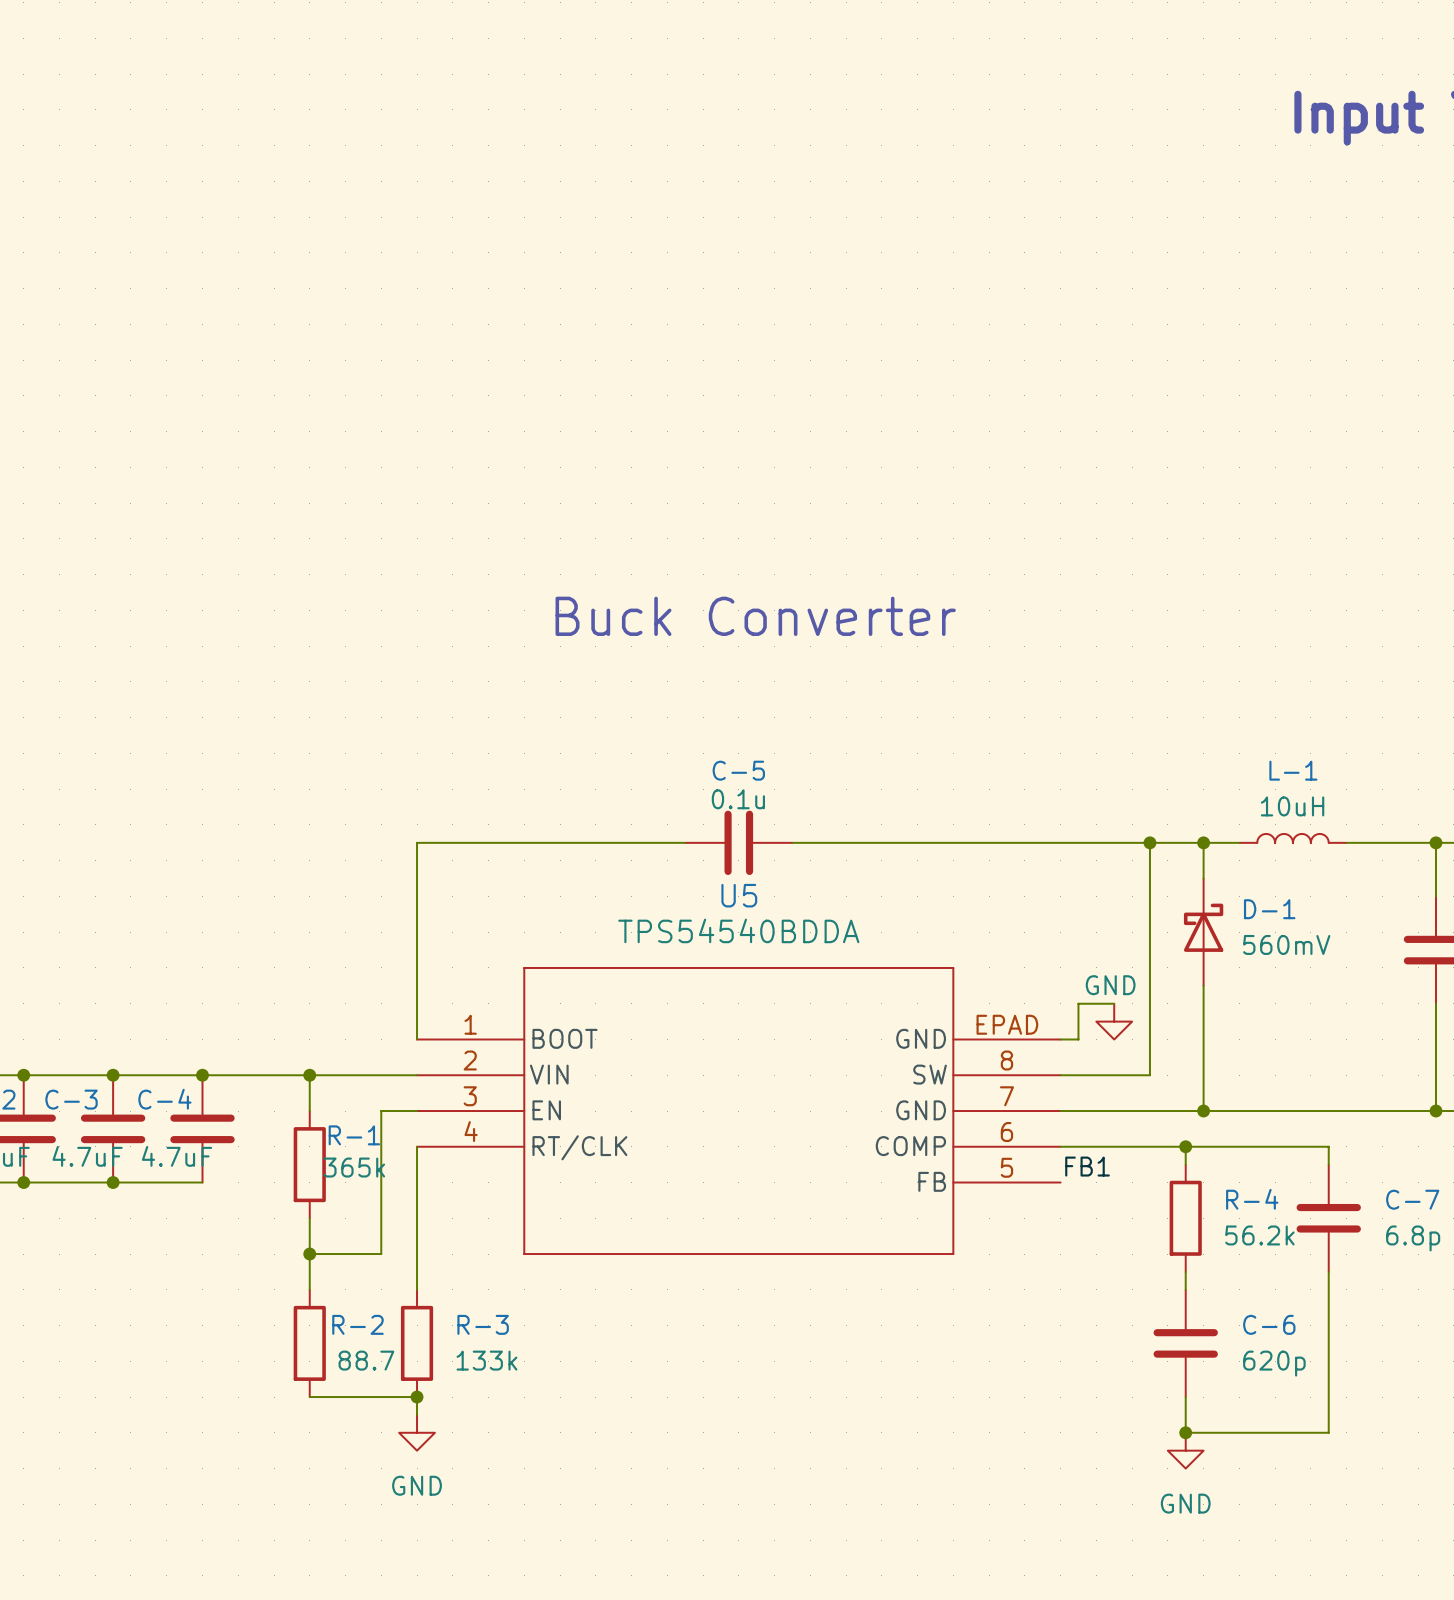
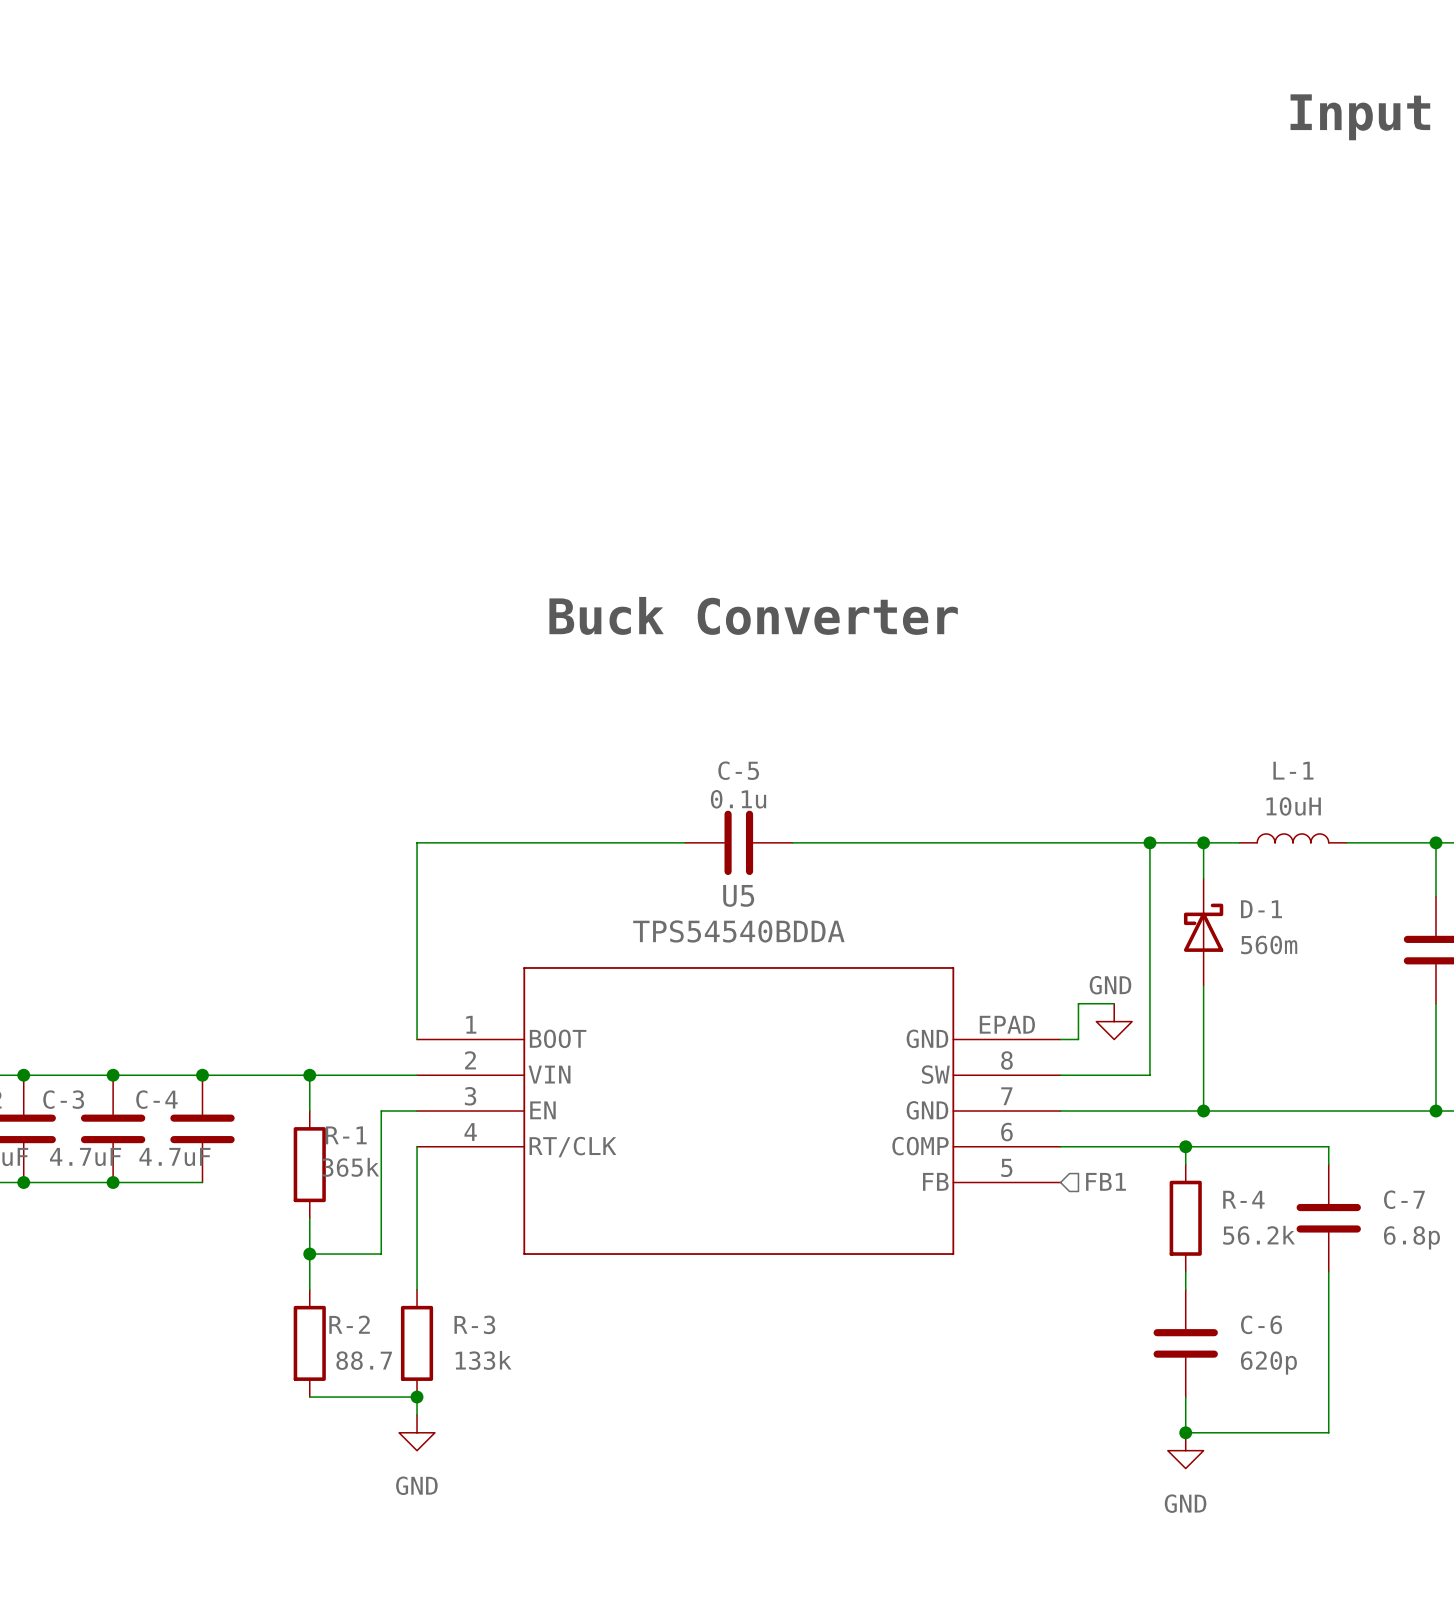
D-1 value: 560mV (1286, 944) -> 560m (1269, 944)
label: FB1 (1087, 1166) -> none
hierarchical label: none -> FB1 (1105, 1181)

